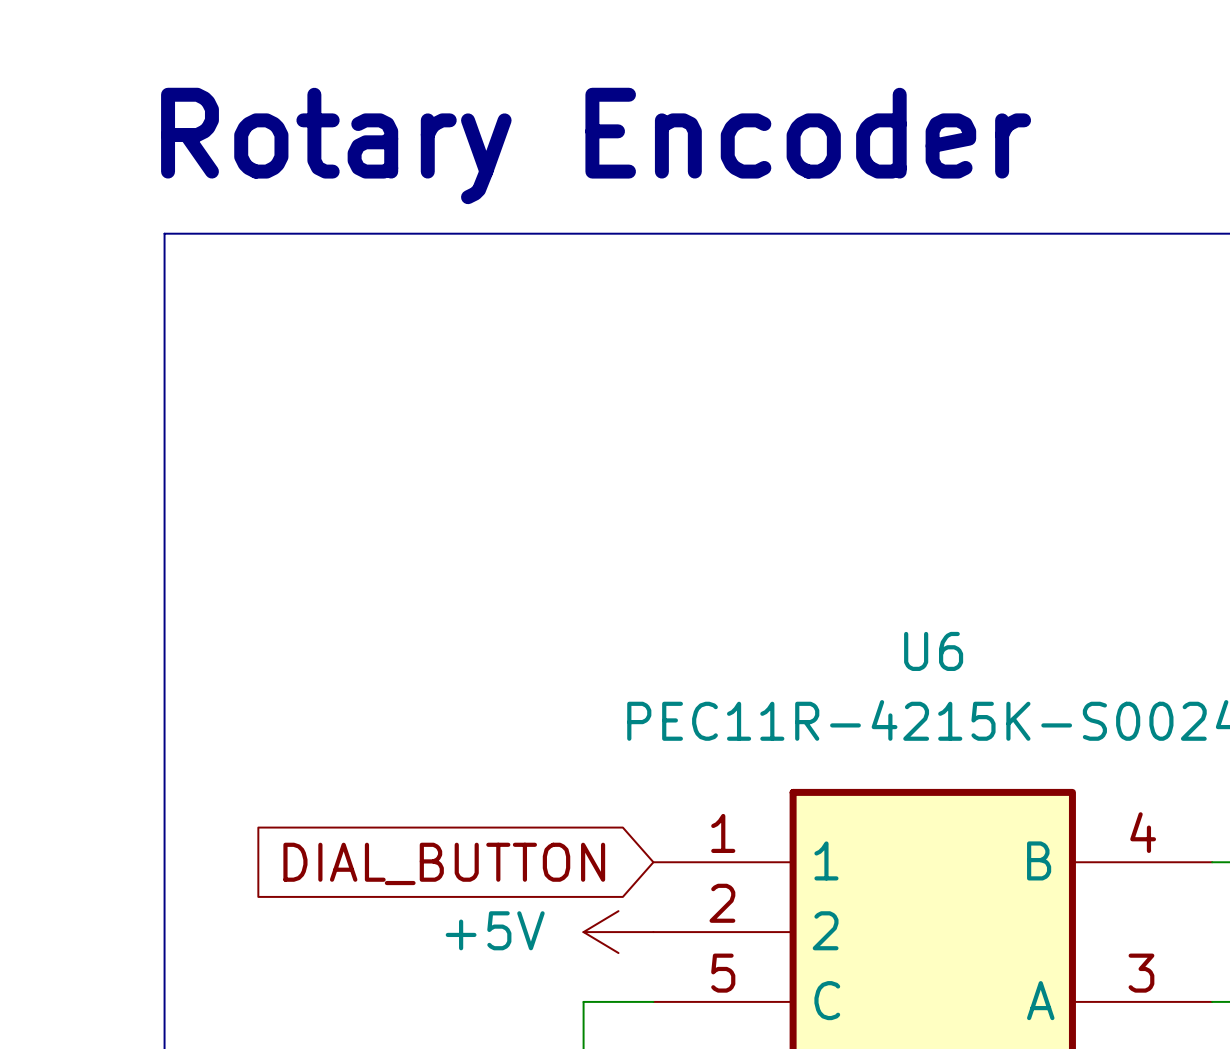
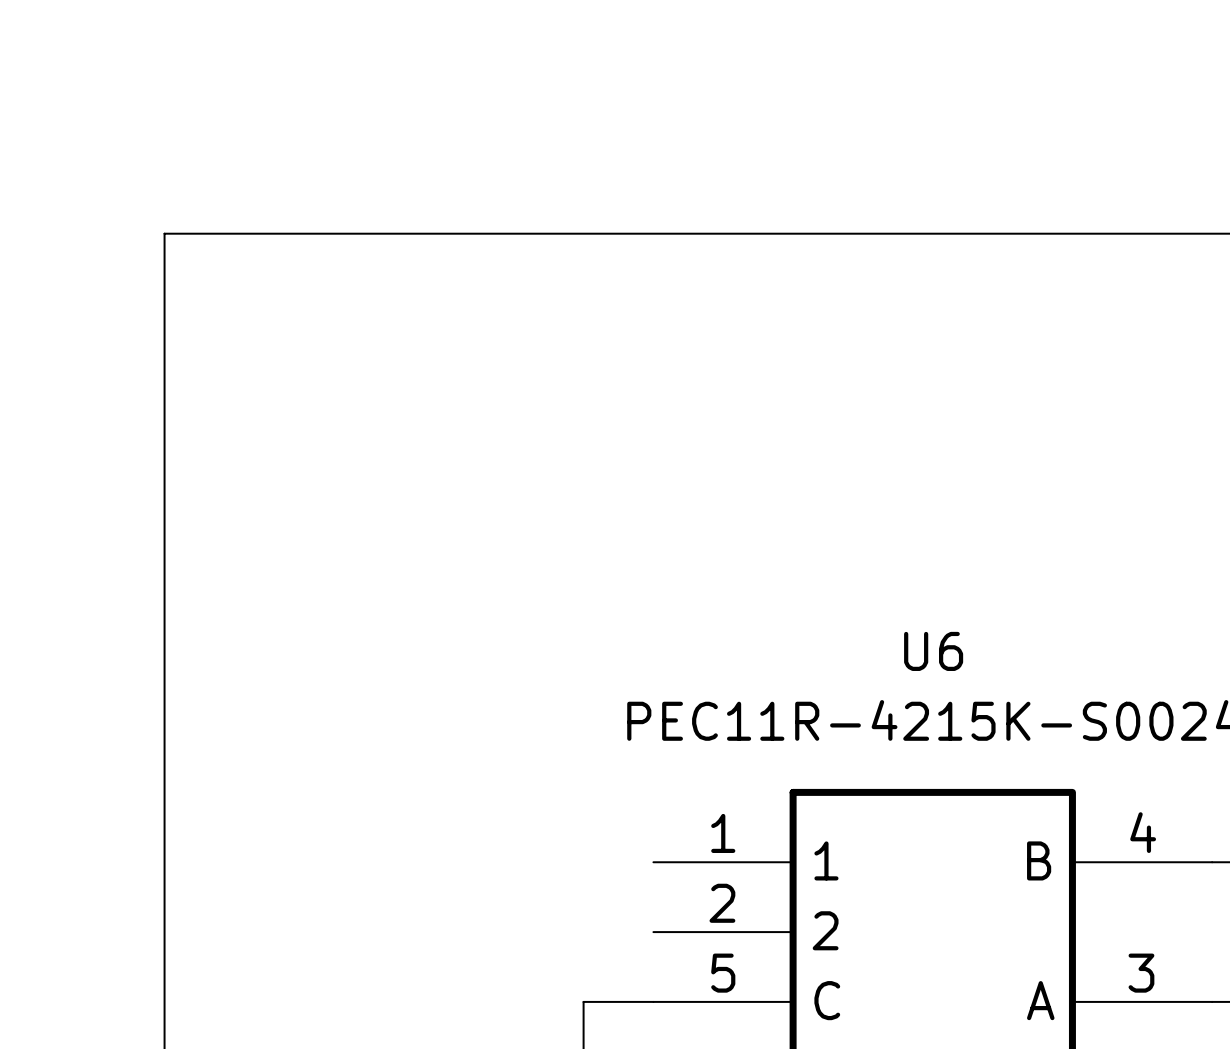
text: Rotary Encoder (596, 145) -> none
global label: DIAL_BUTTON (444, 863) -> none
power symbol: +5V (618, 932) -> none

